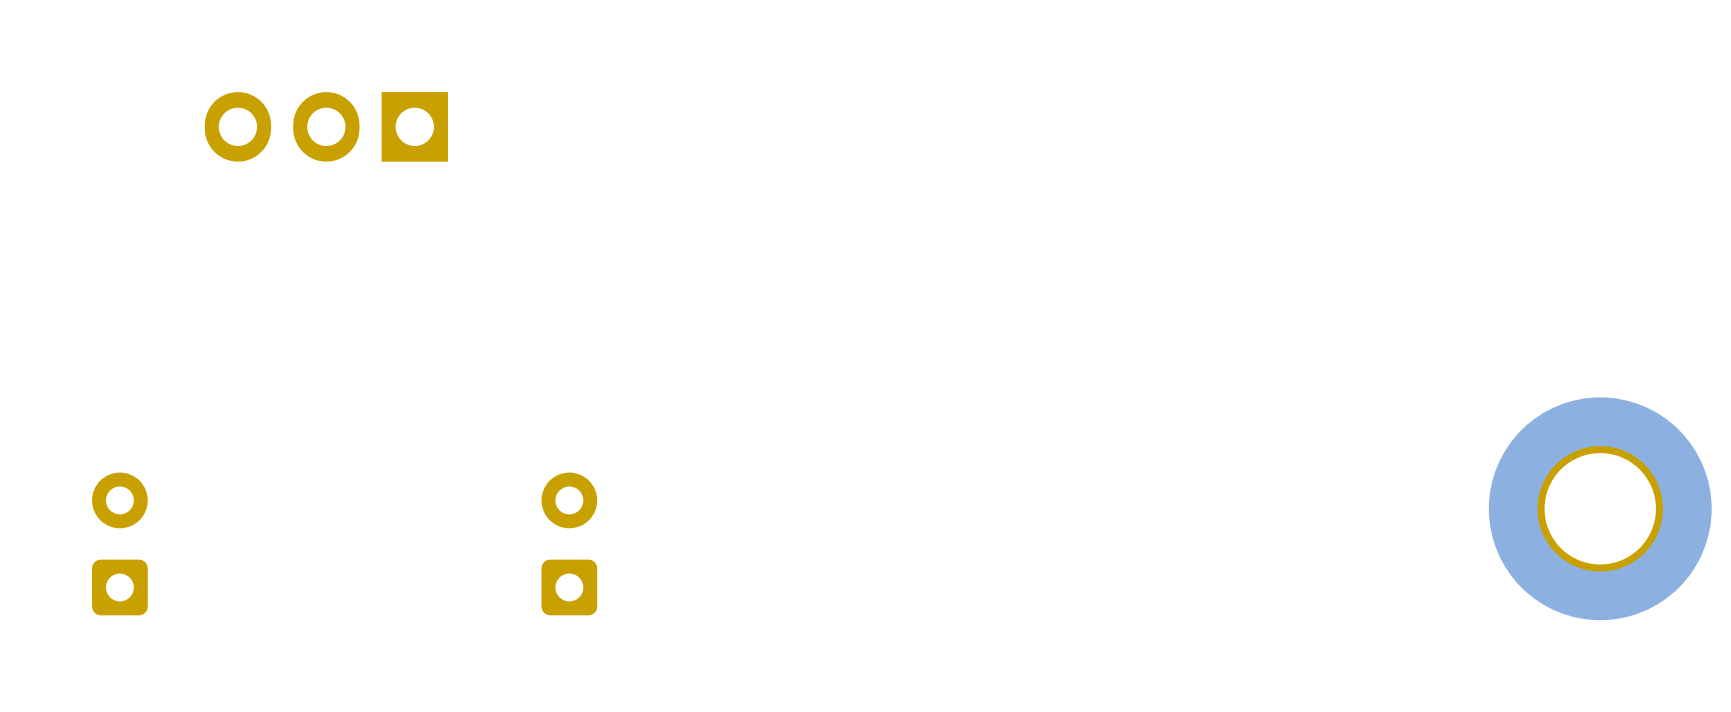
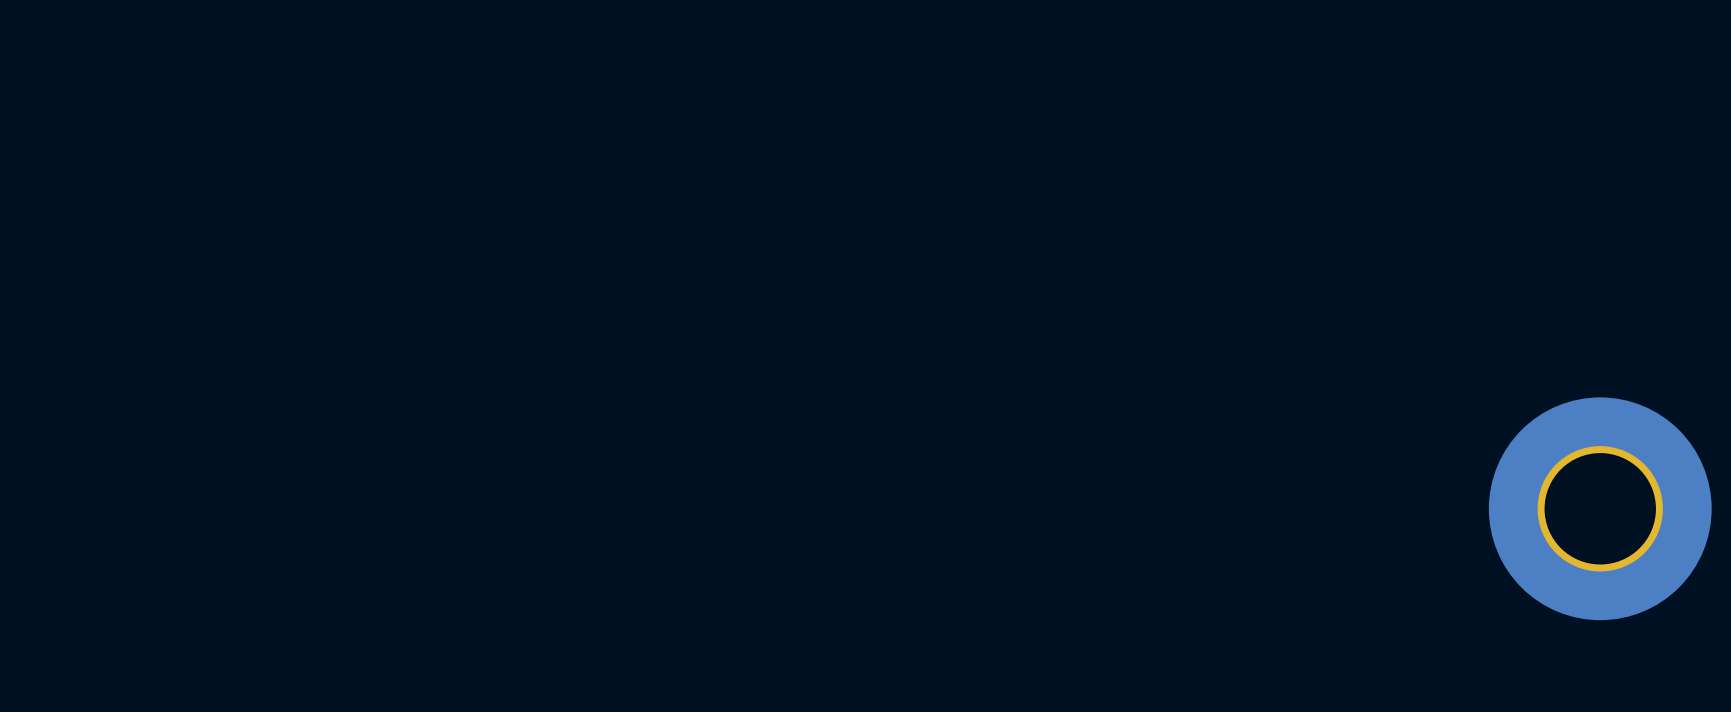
part: (326, 126) -> none
part: (119, 543) -> none
part: (569, 543) -> none

